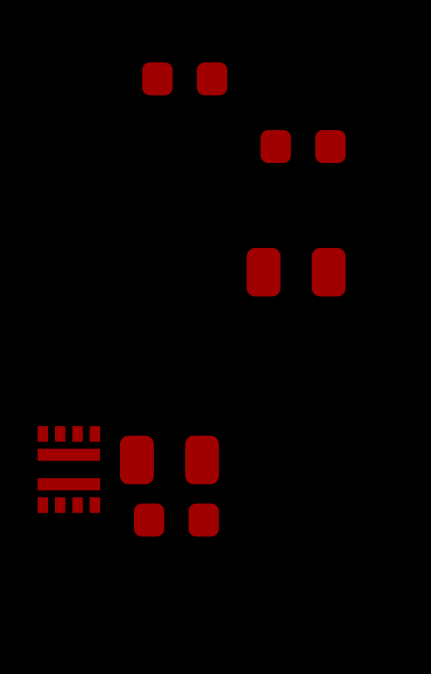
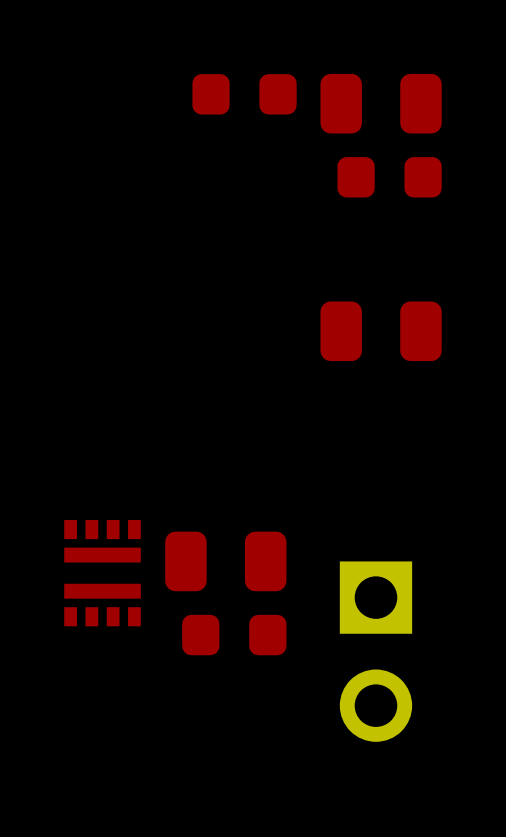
part: none -> (381, 103)
part: none -> (375, 651)

